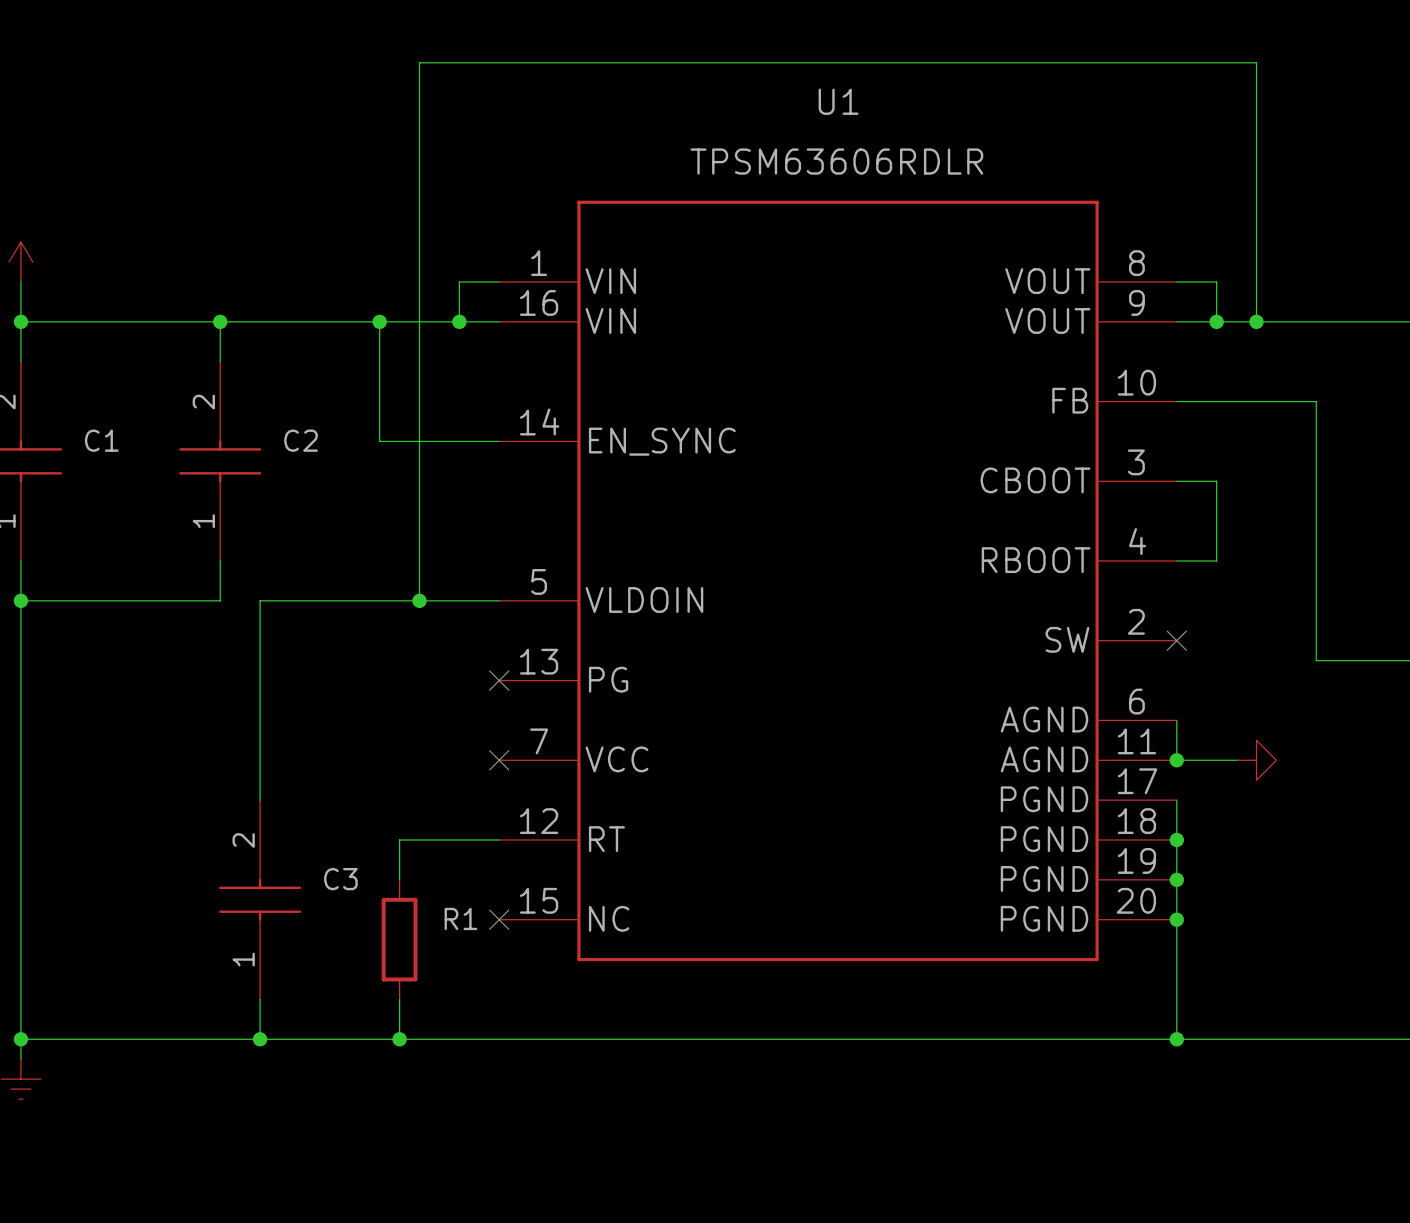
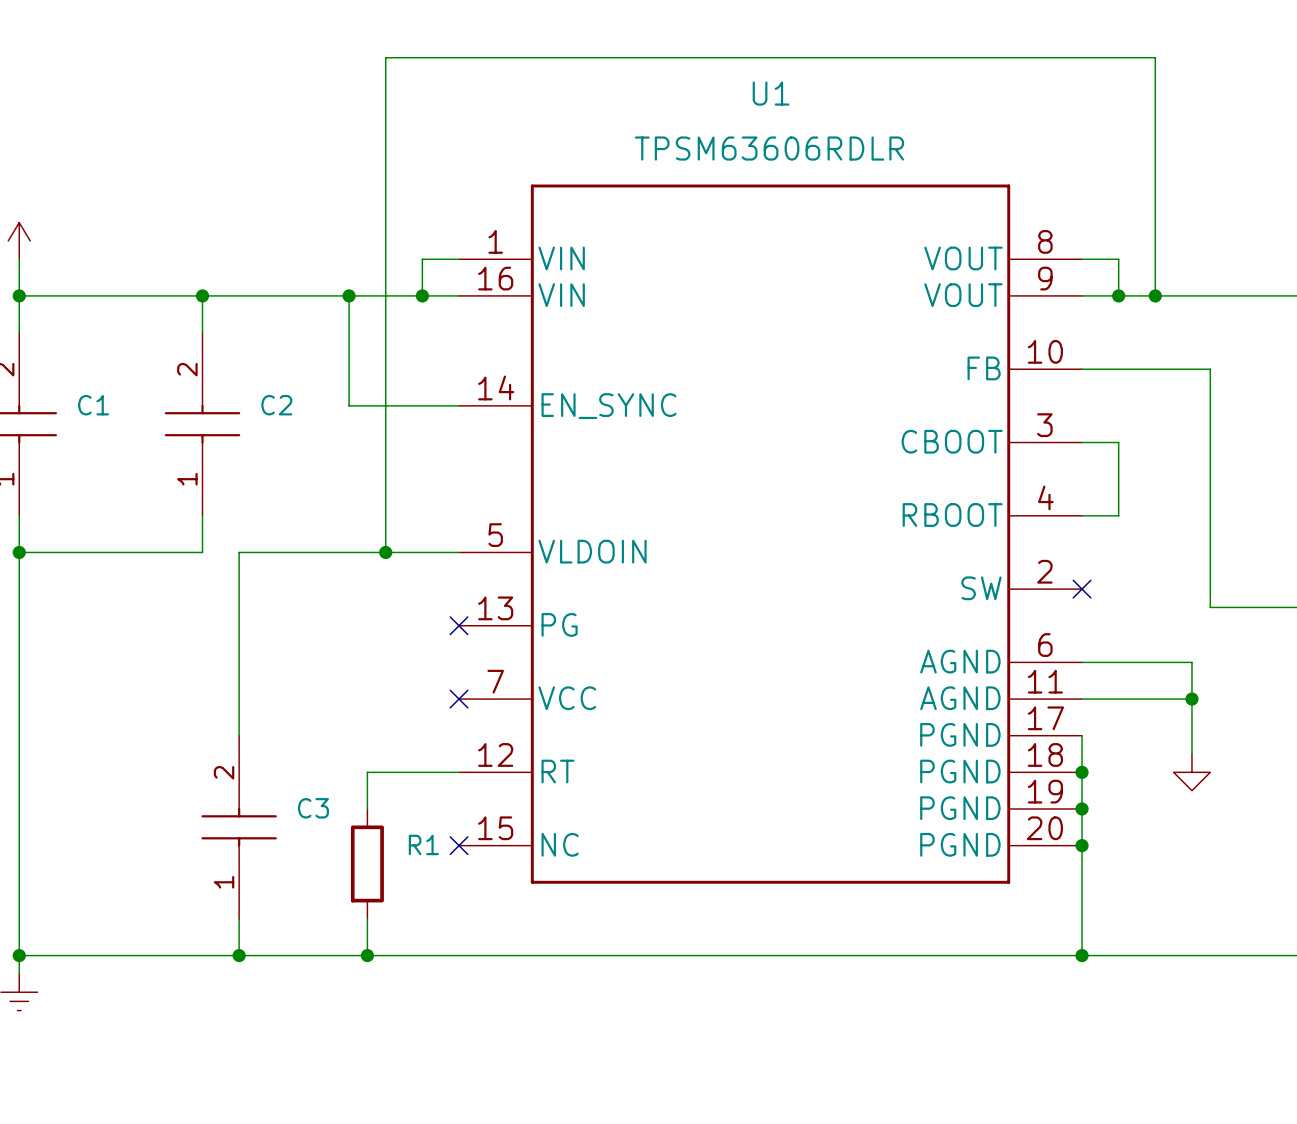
wire: (1176, 720) (1176, 760) -> (1082, 662) (1191, 662) (1191, 754)
junction: (1176, 760) -> none
wire: none -> (1137, 699) (1191, 699)
power symbol rotation: 0° (1256, 760) -> 90° clockwise (1191, 772)
power symbol position: (1256, 760) -> (1191, 772)
junction: none -> (1191, 699)

